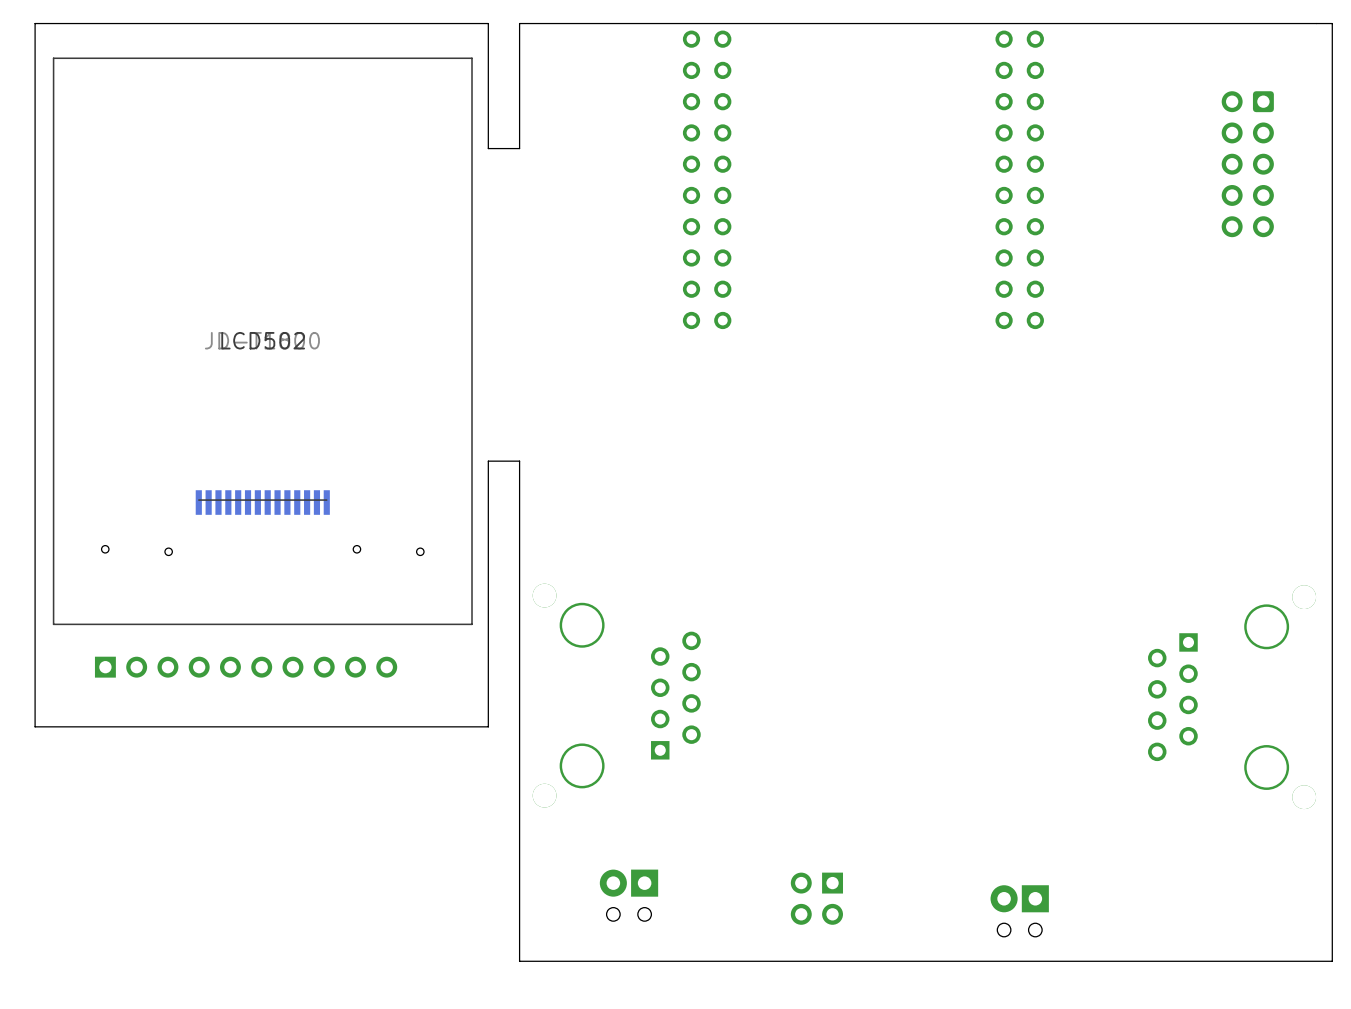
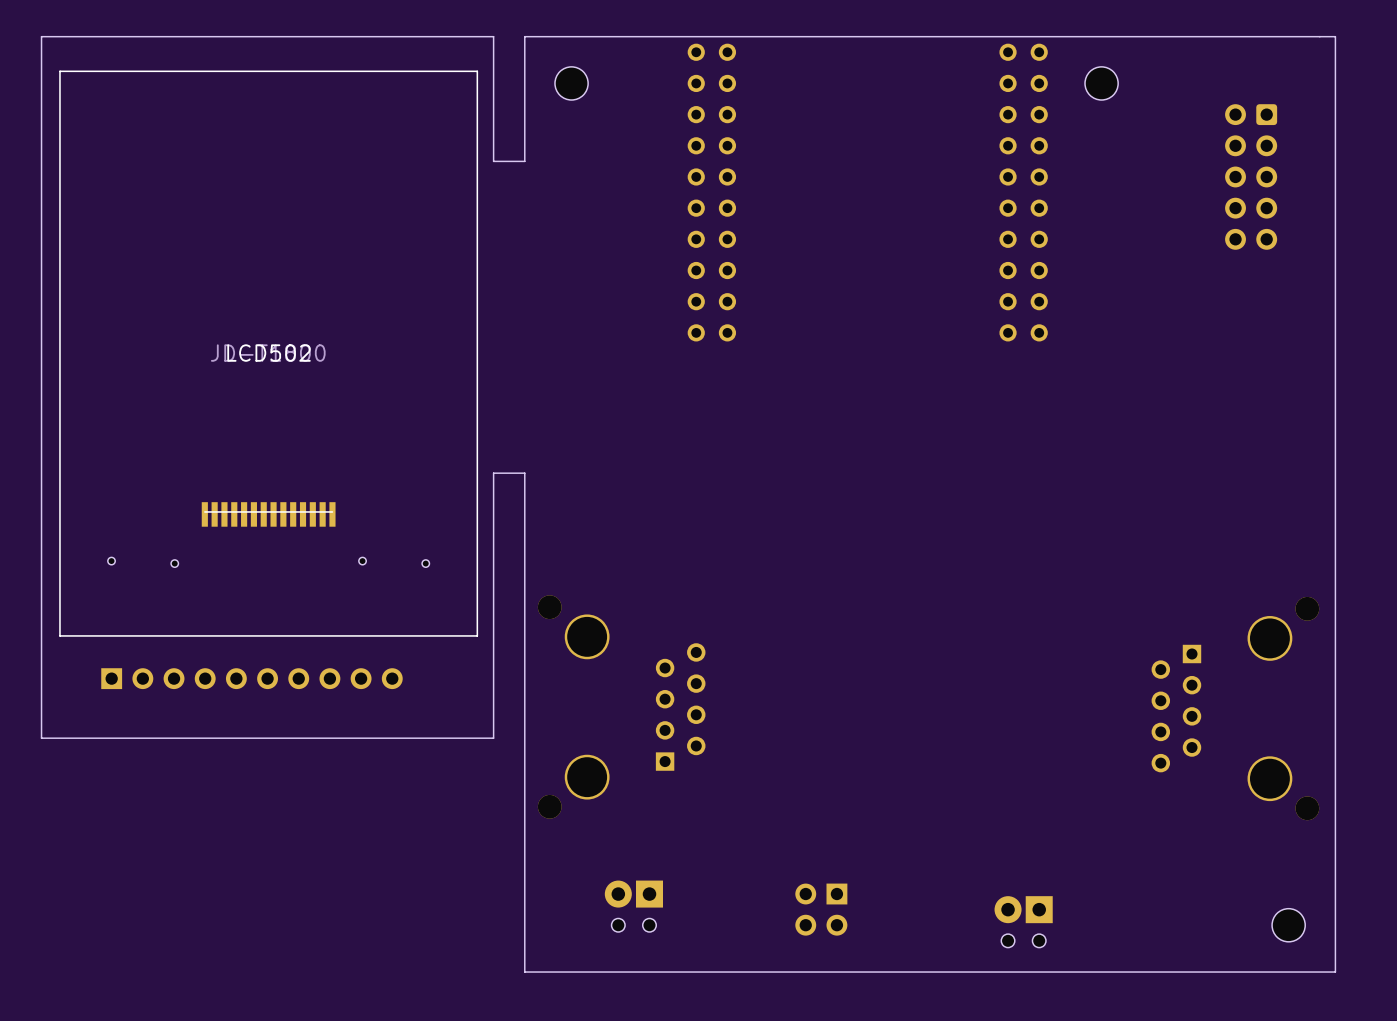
part: none -> (571, 83)
part: none -> (1101, 83)
part: none -> (1288, 925)

